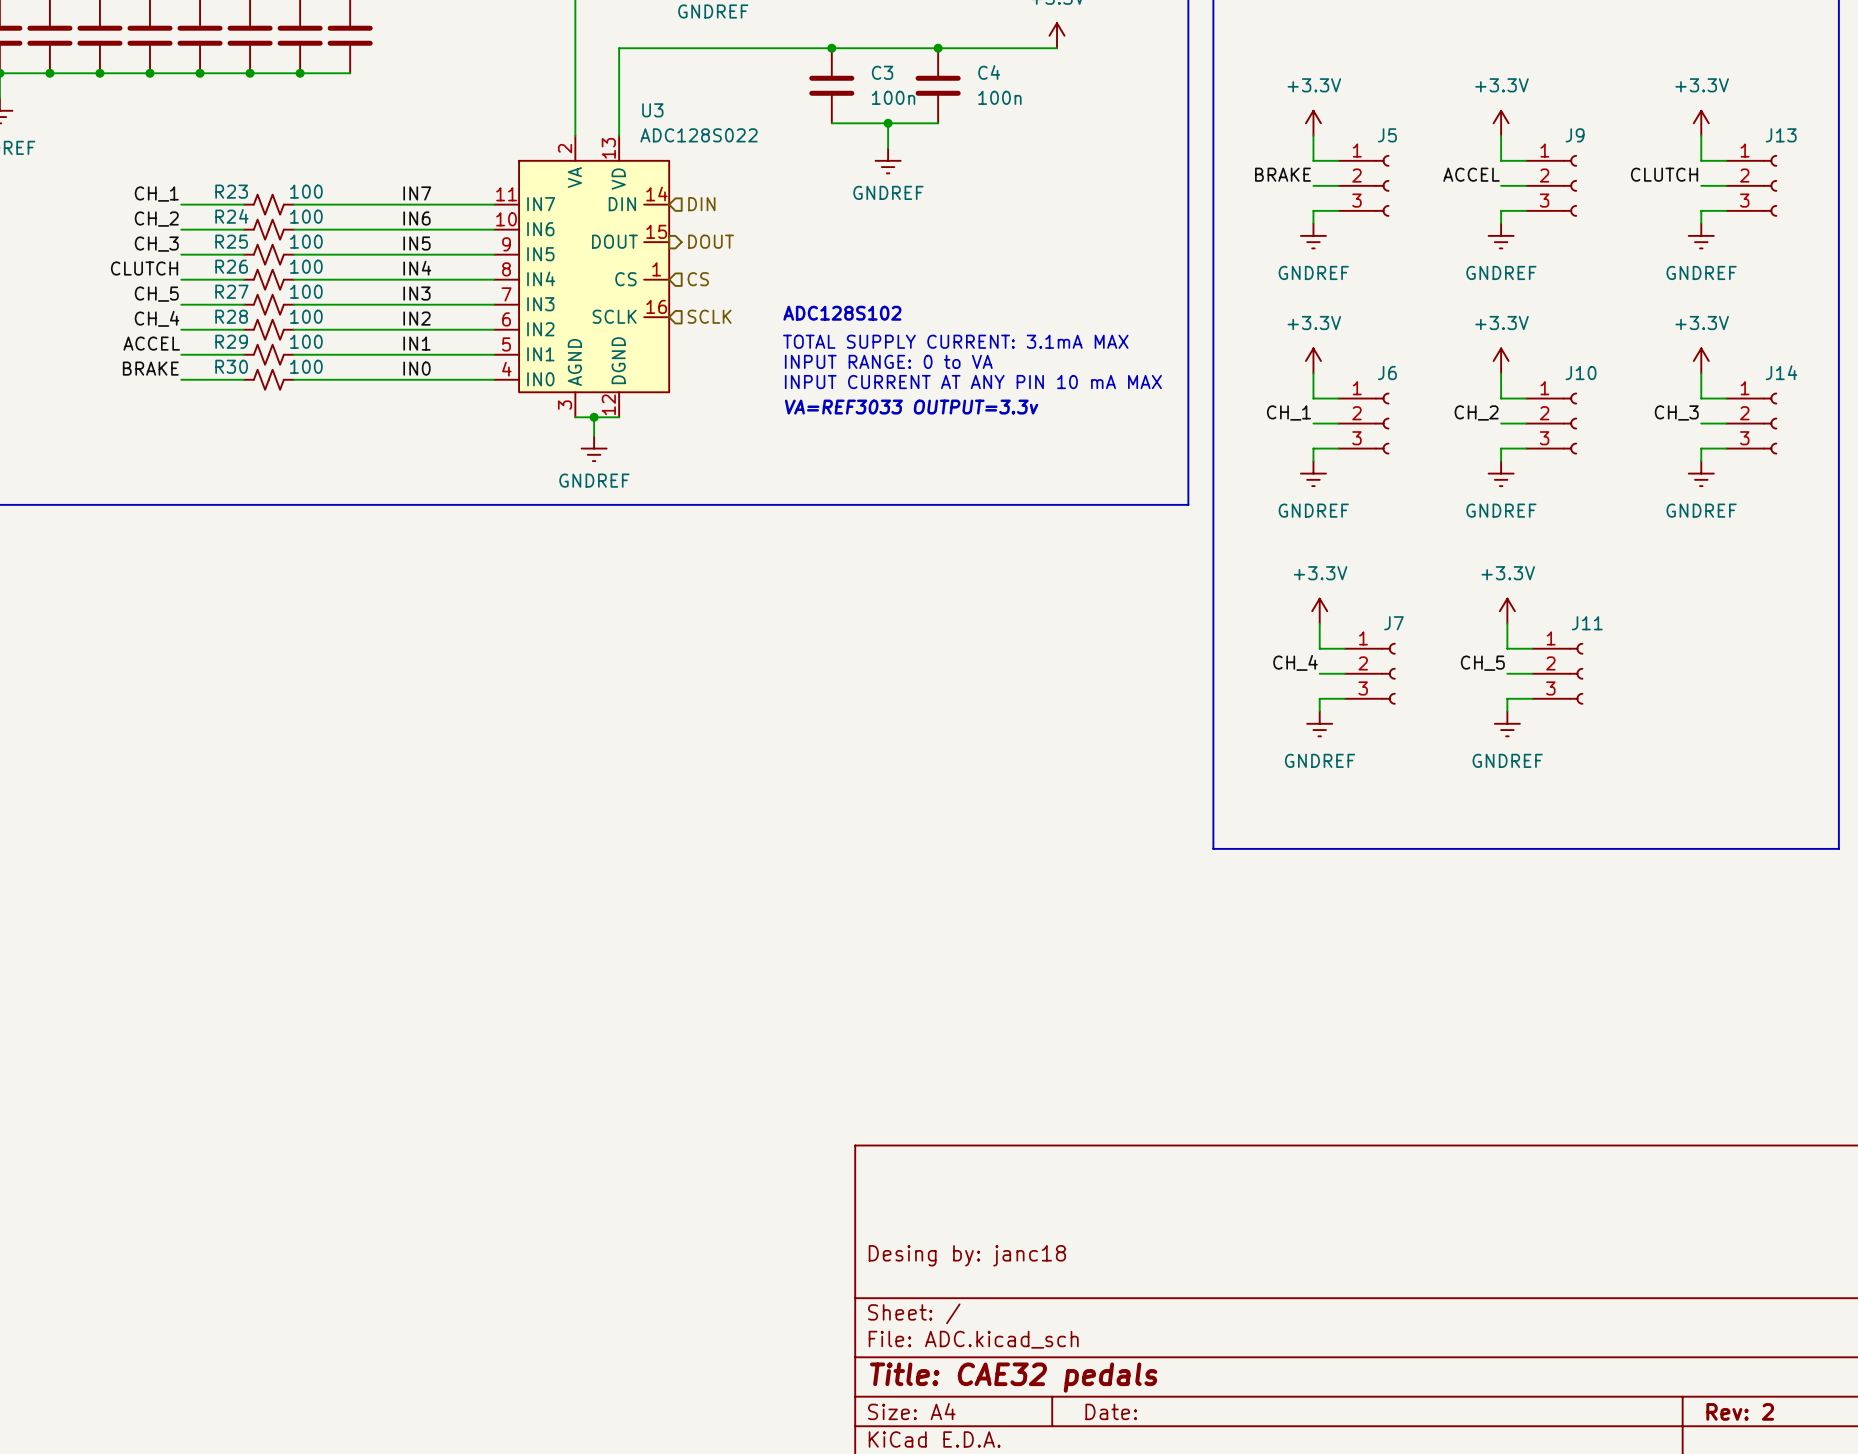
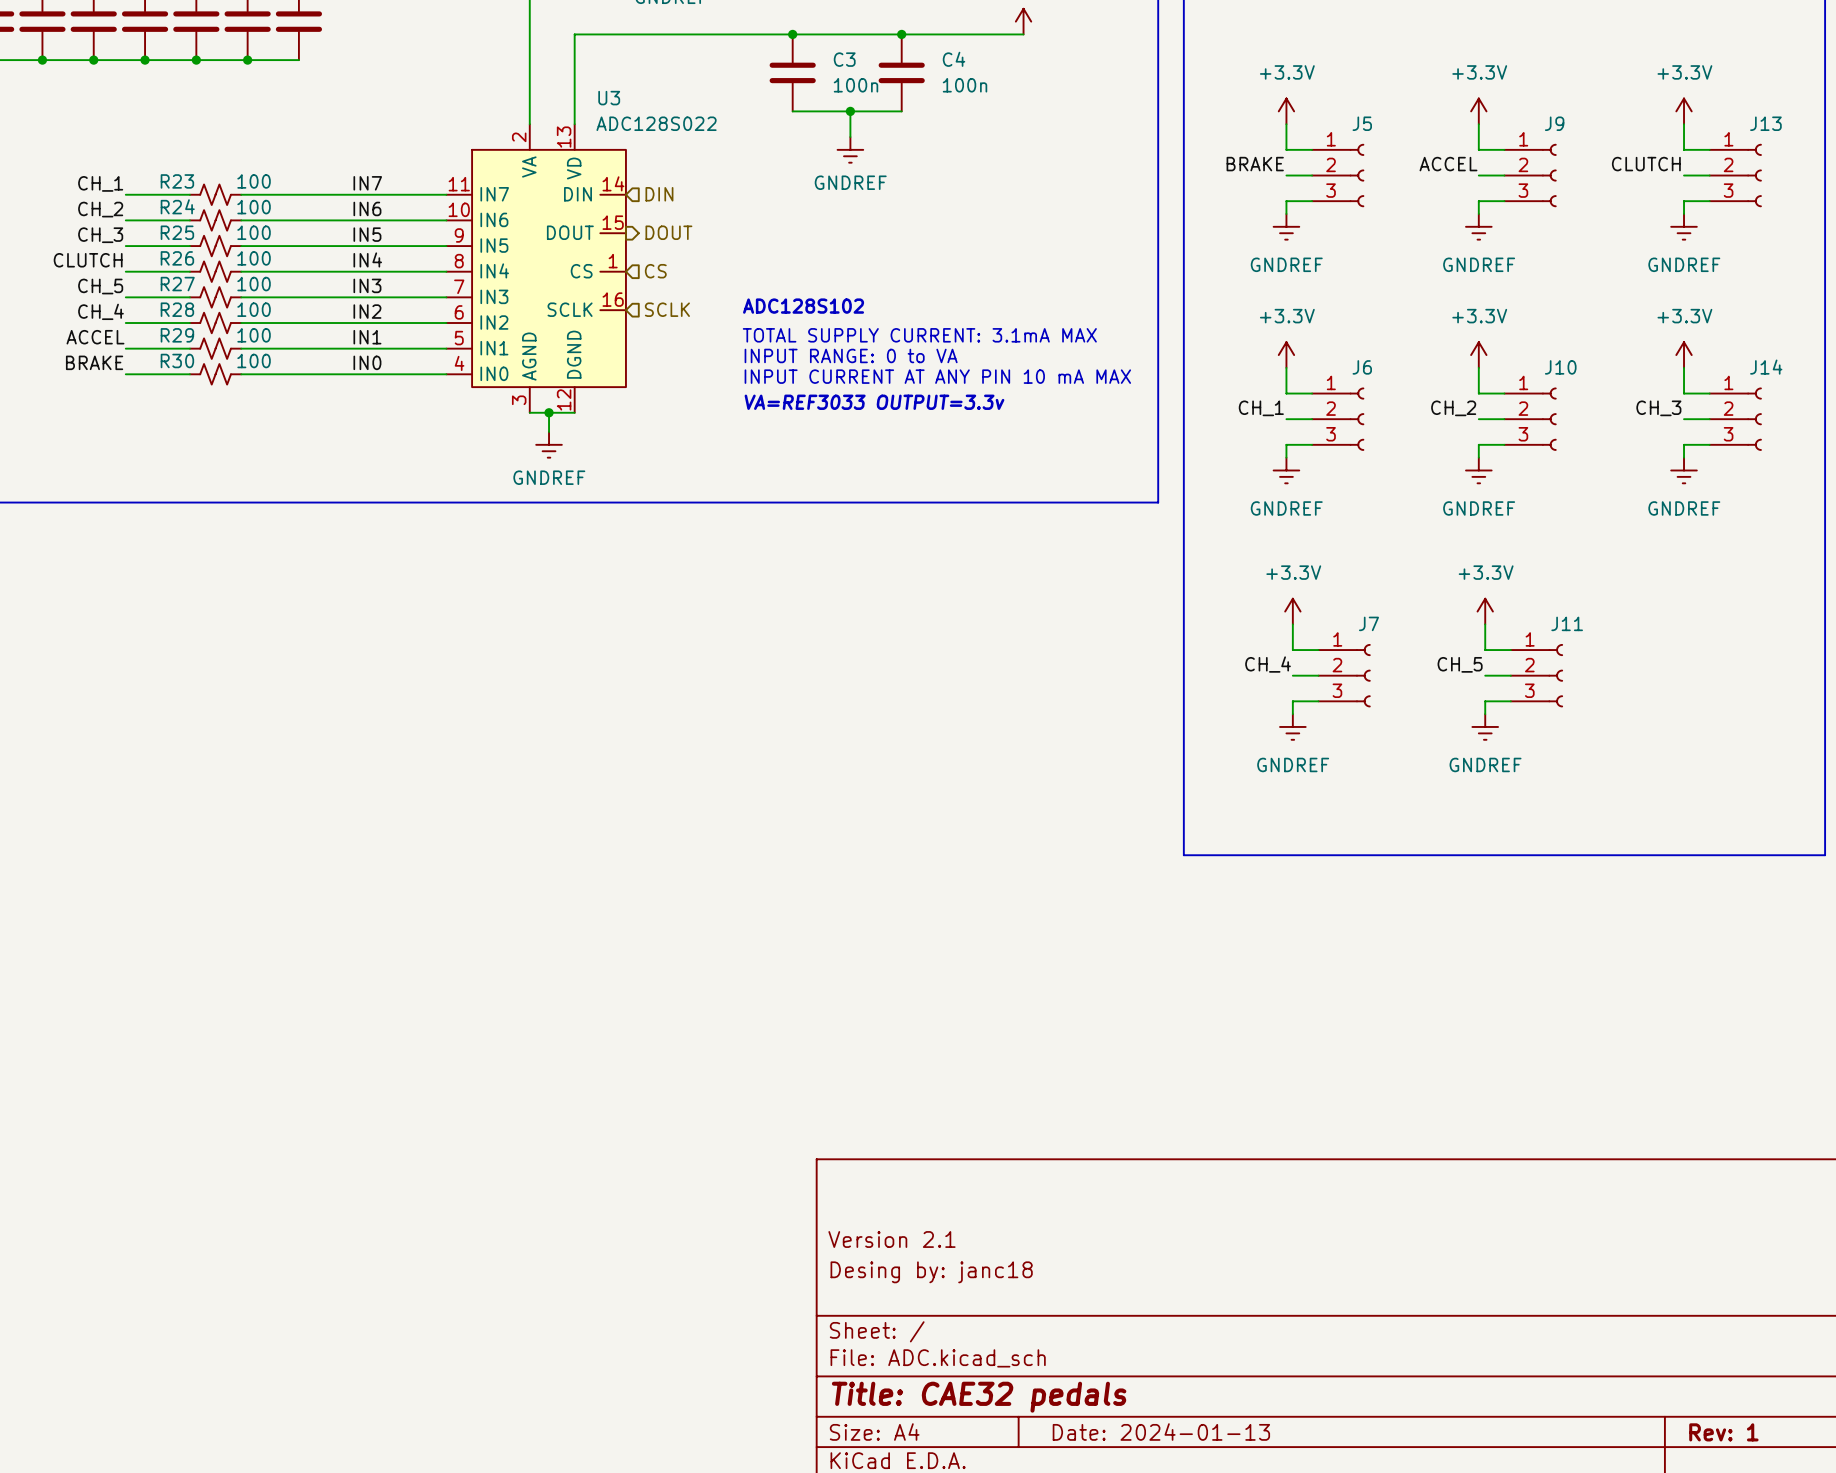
title block: none -> Version 2.1 (891, 1239)
title block: Date: (1111, 1411) -> Date: 2024-01-13 (1161, 1432)
title block: Rev: 2 (1740, 1411) -> Rev: 1 (1723, 1432)

